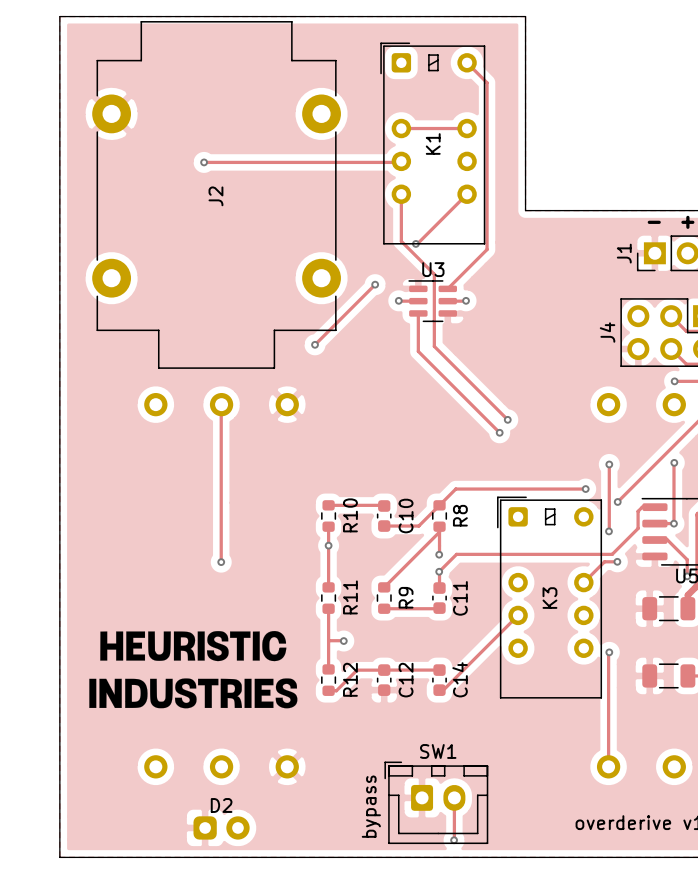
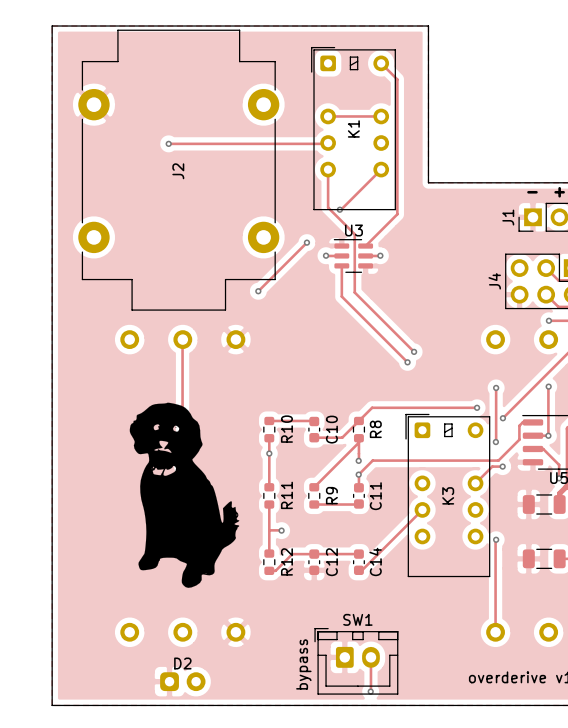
drawing: none -> [129, 402, 240, 588]
drawing: [89, 631, 298, 709] -> none

